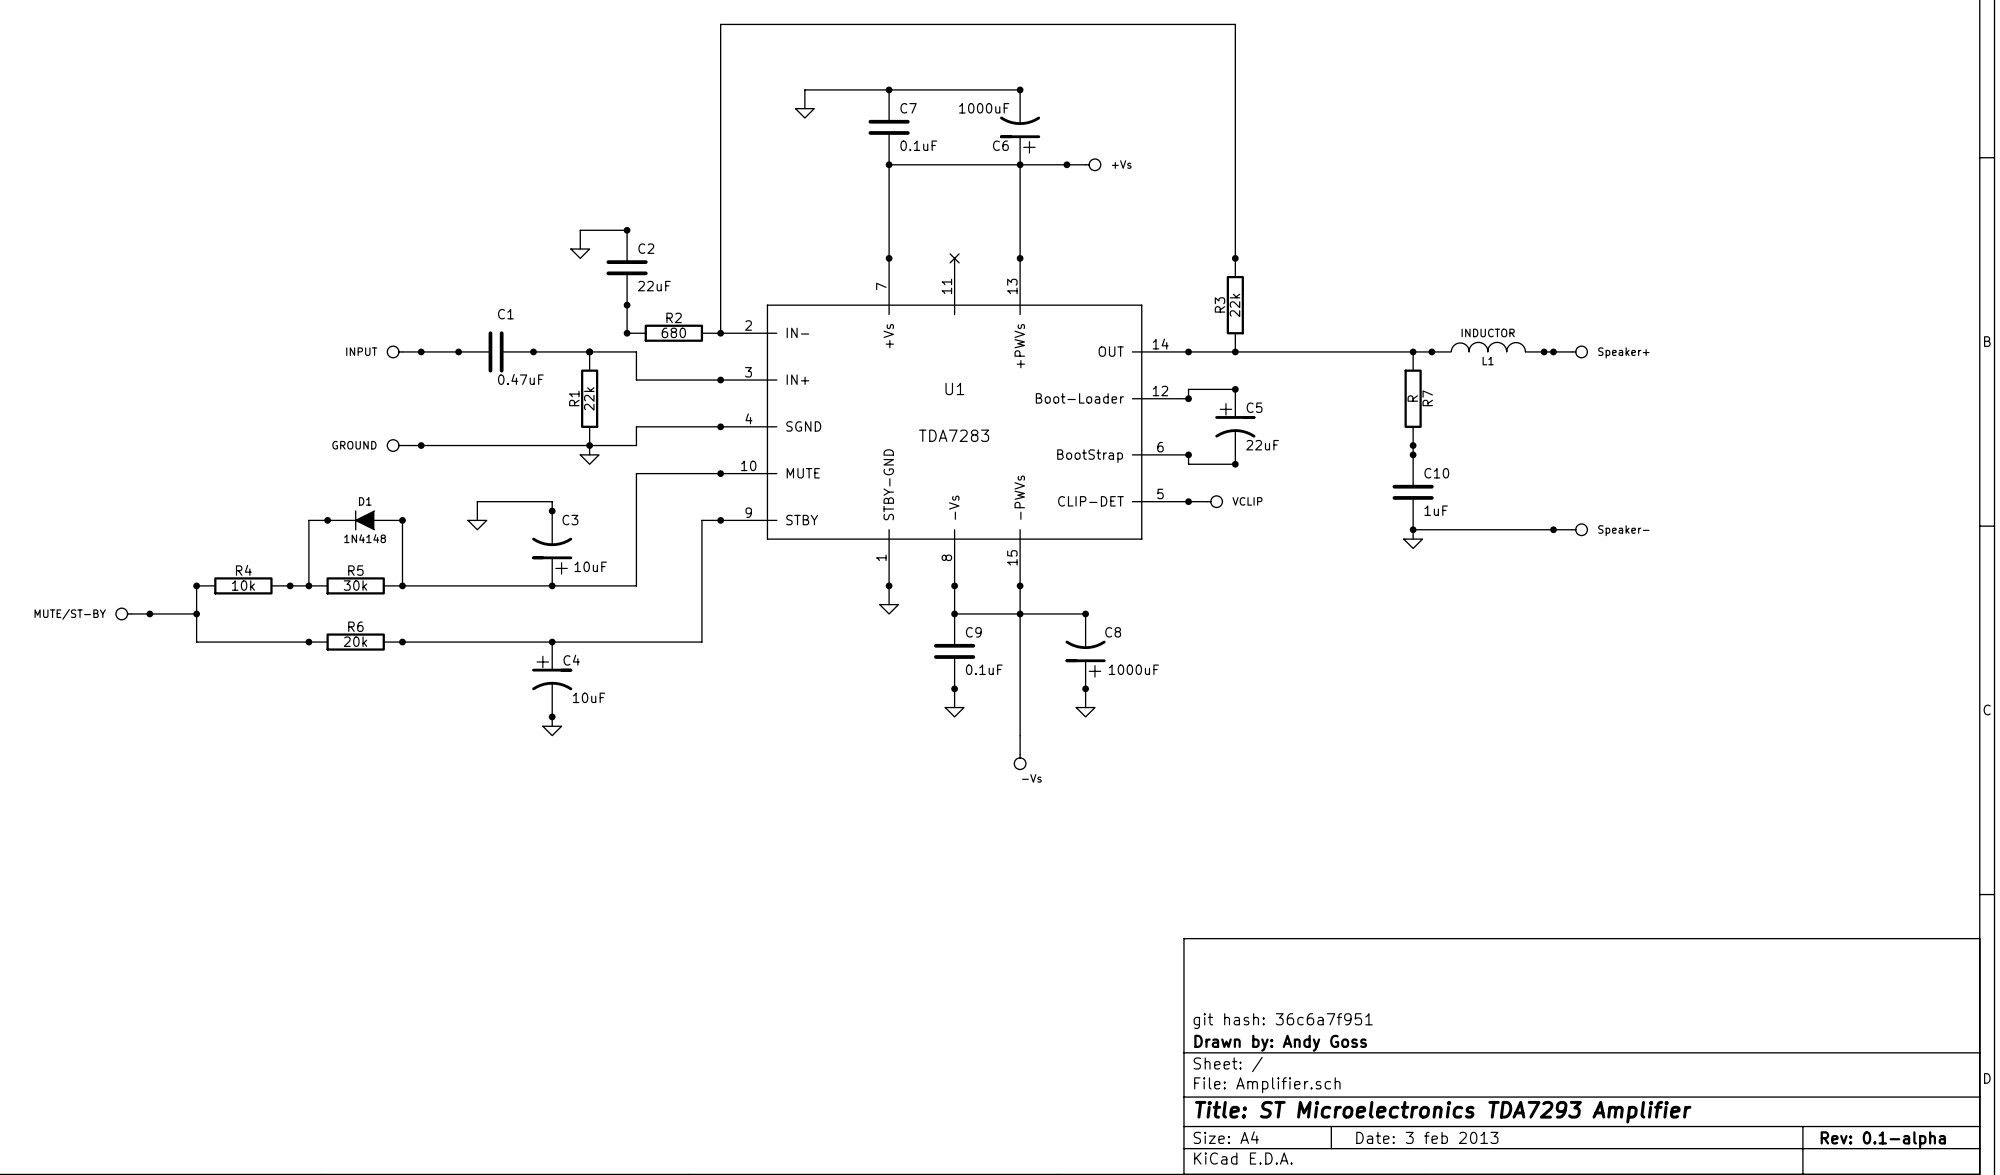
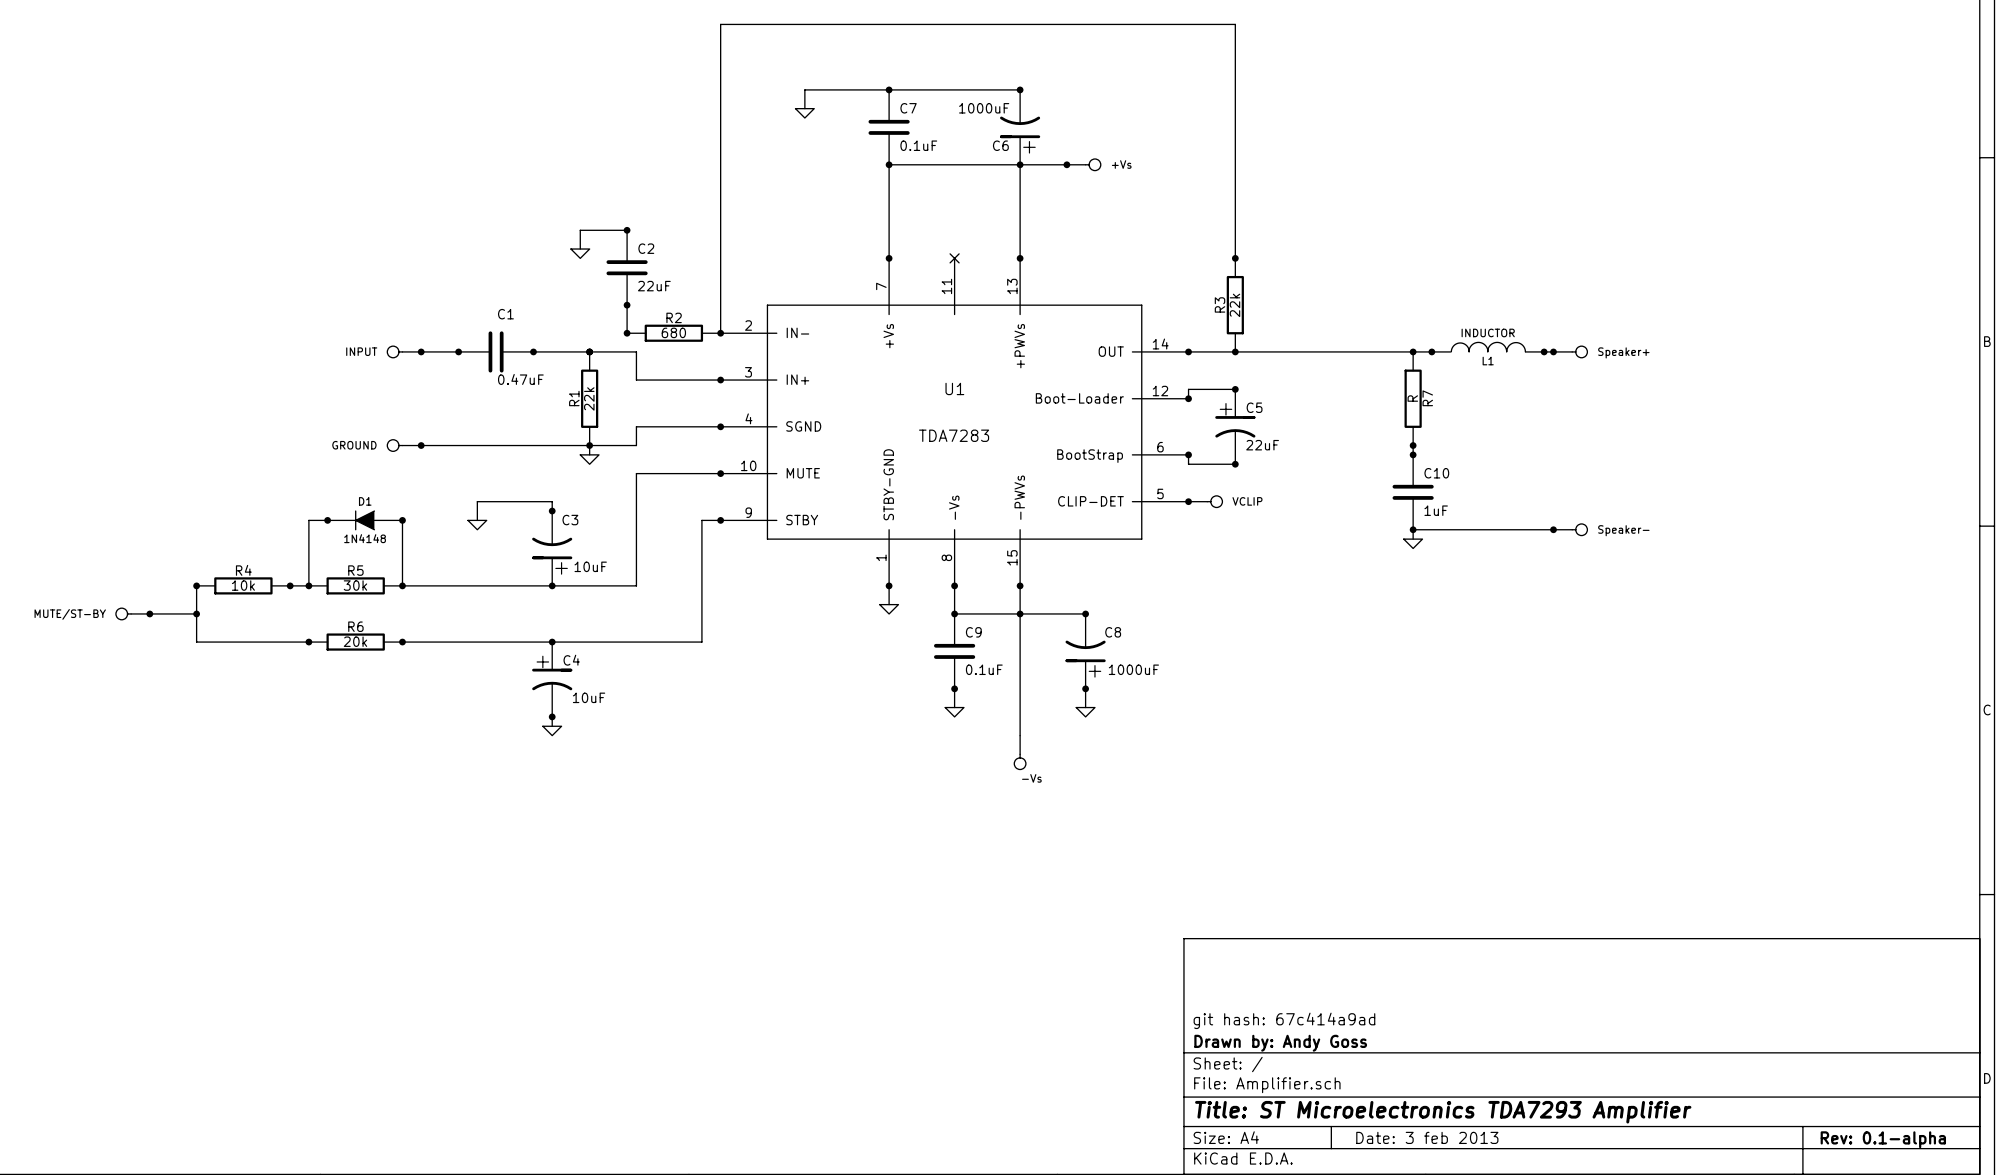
title block: git hash: 36c6a7f951 (1283, 1021) -> git hash: 67c414a9ad (1284, 1020)

